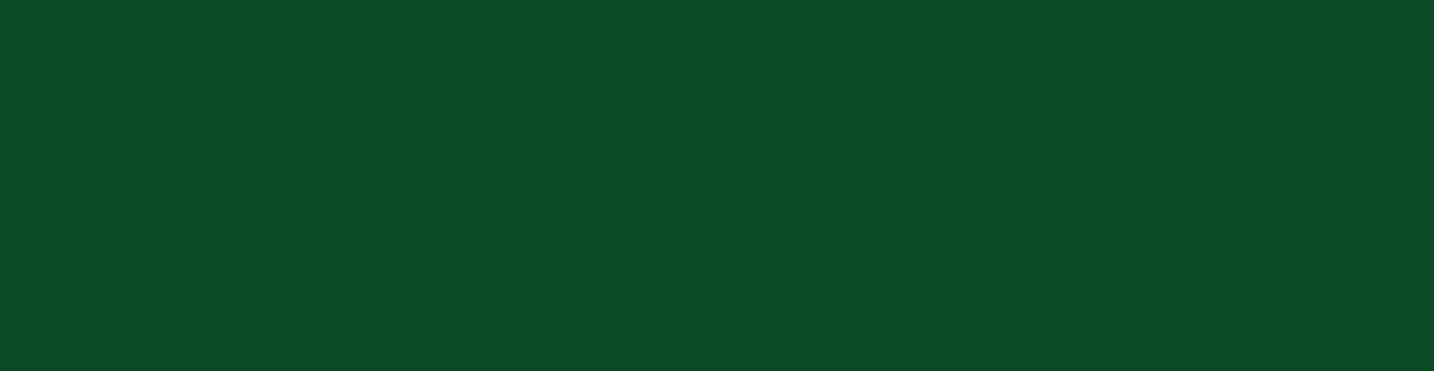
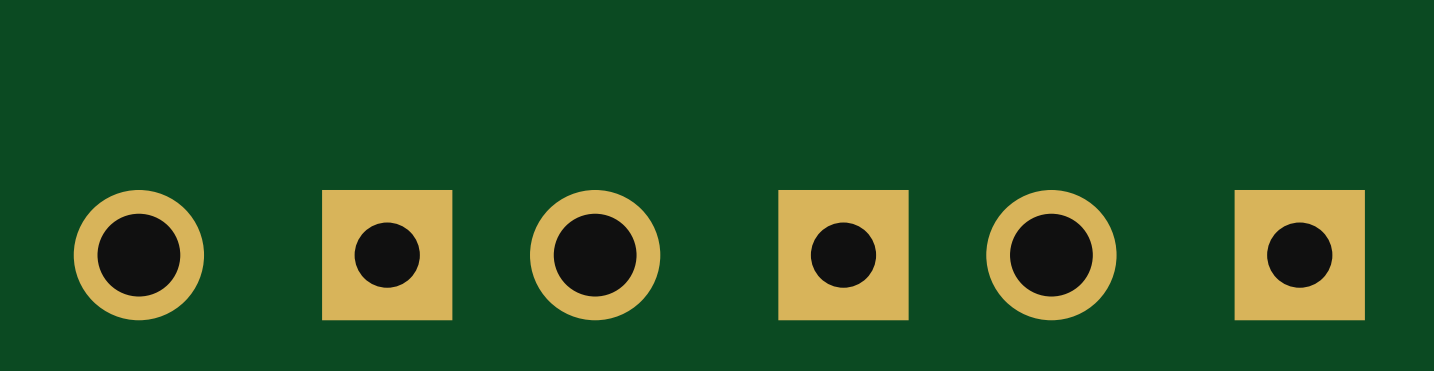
part: none -> (263, 255)
part: none -> (719, 255)
part: none -> (1175, 255)

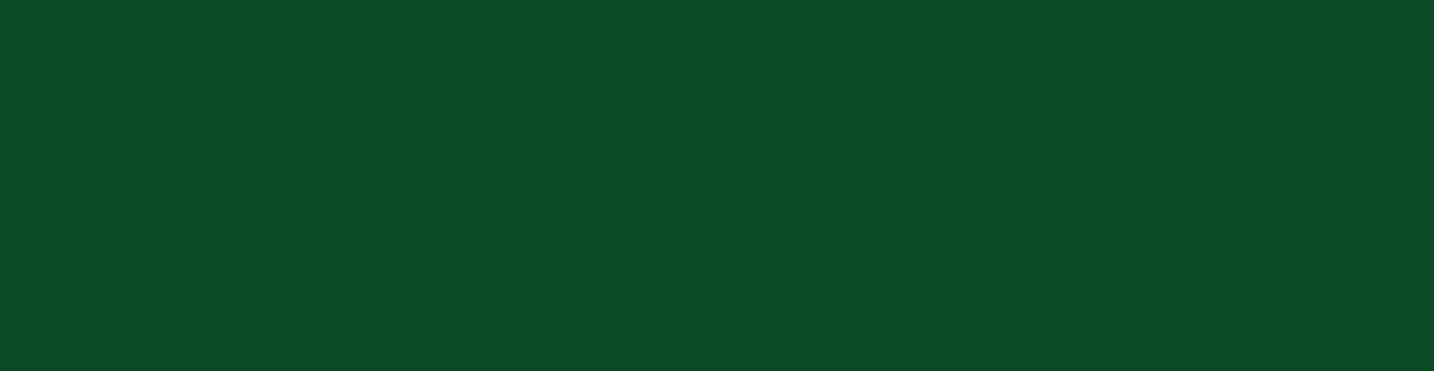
part: (263, 255) -> none
part: (719, 255) -> none
part: (1175, 255) -> none

